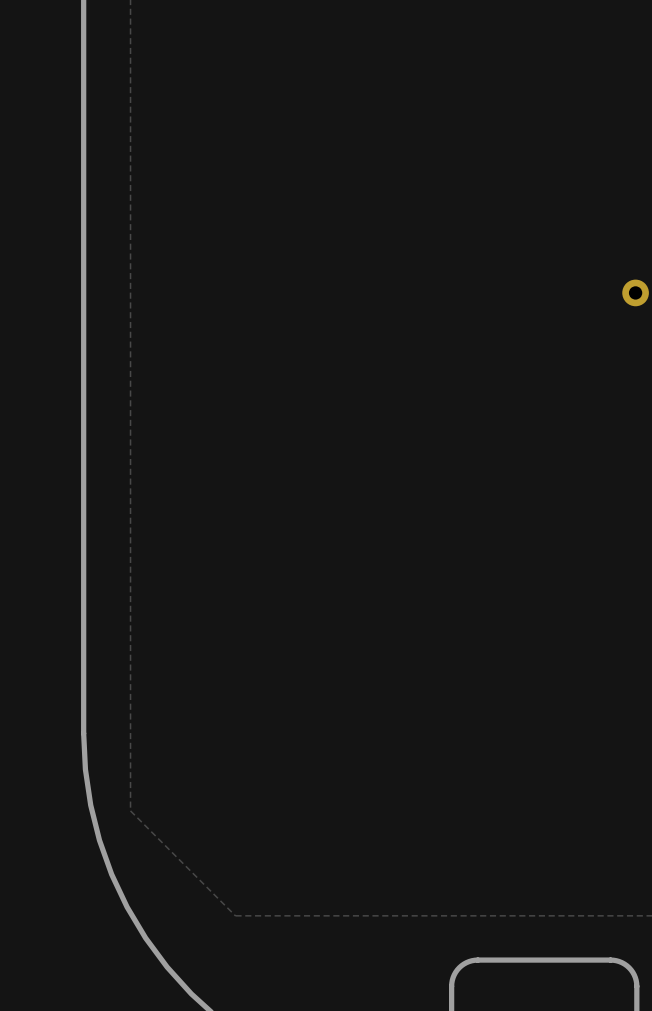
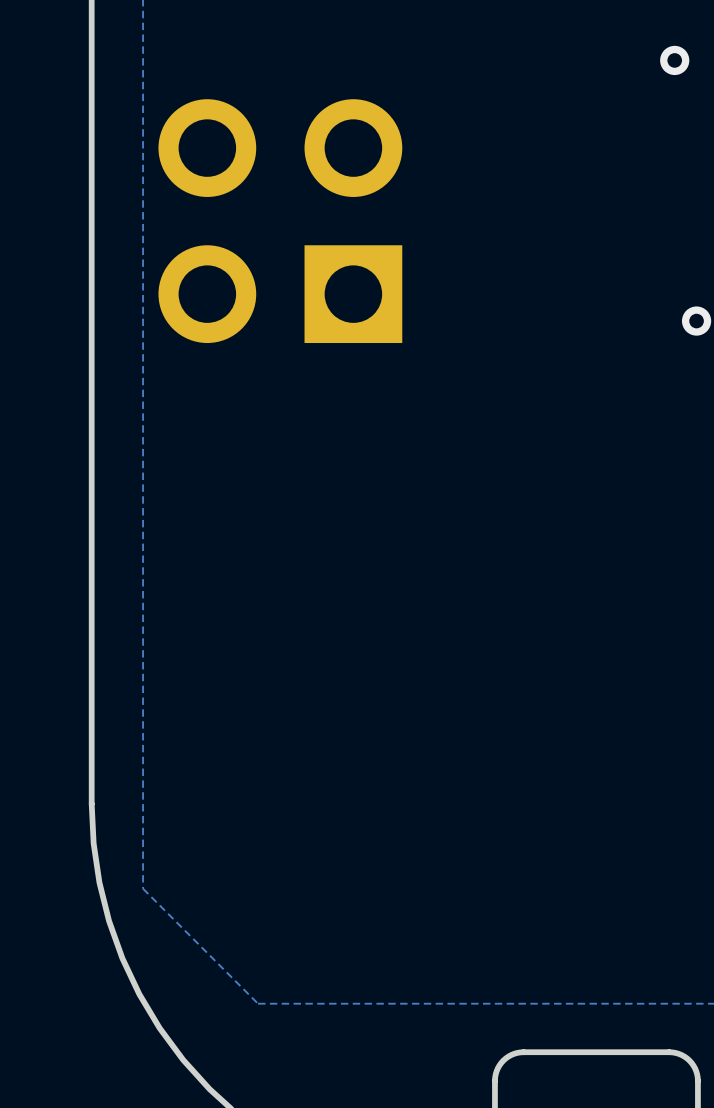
via: none -> (674, 60)
part: none -> (280, 221)

